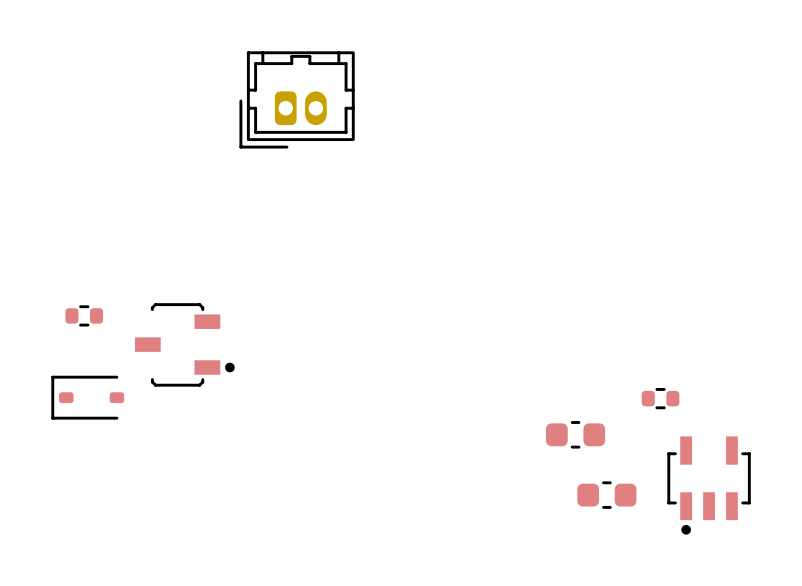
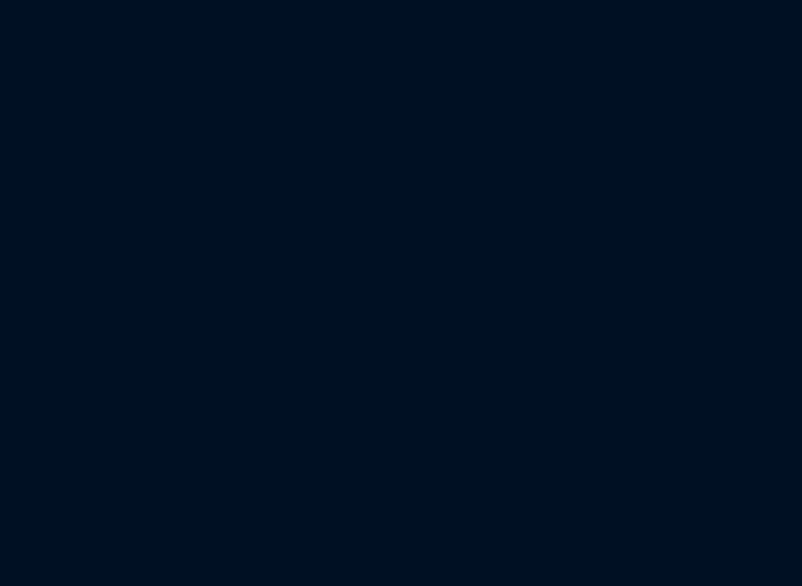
part: (297, 99) -> none
part: (84, 315) -> none
part: (184, 344) -> none
part: (87, 397) -> none
part: (660, 398) -> none
part: (575, 434) -> none
part: (709, 485) -> none
part: (606, 495) -> none

